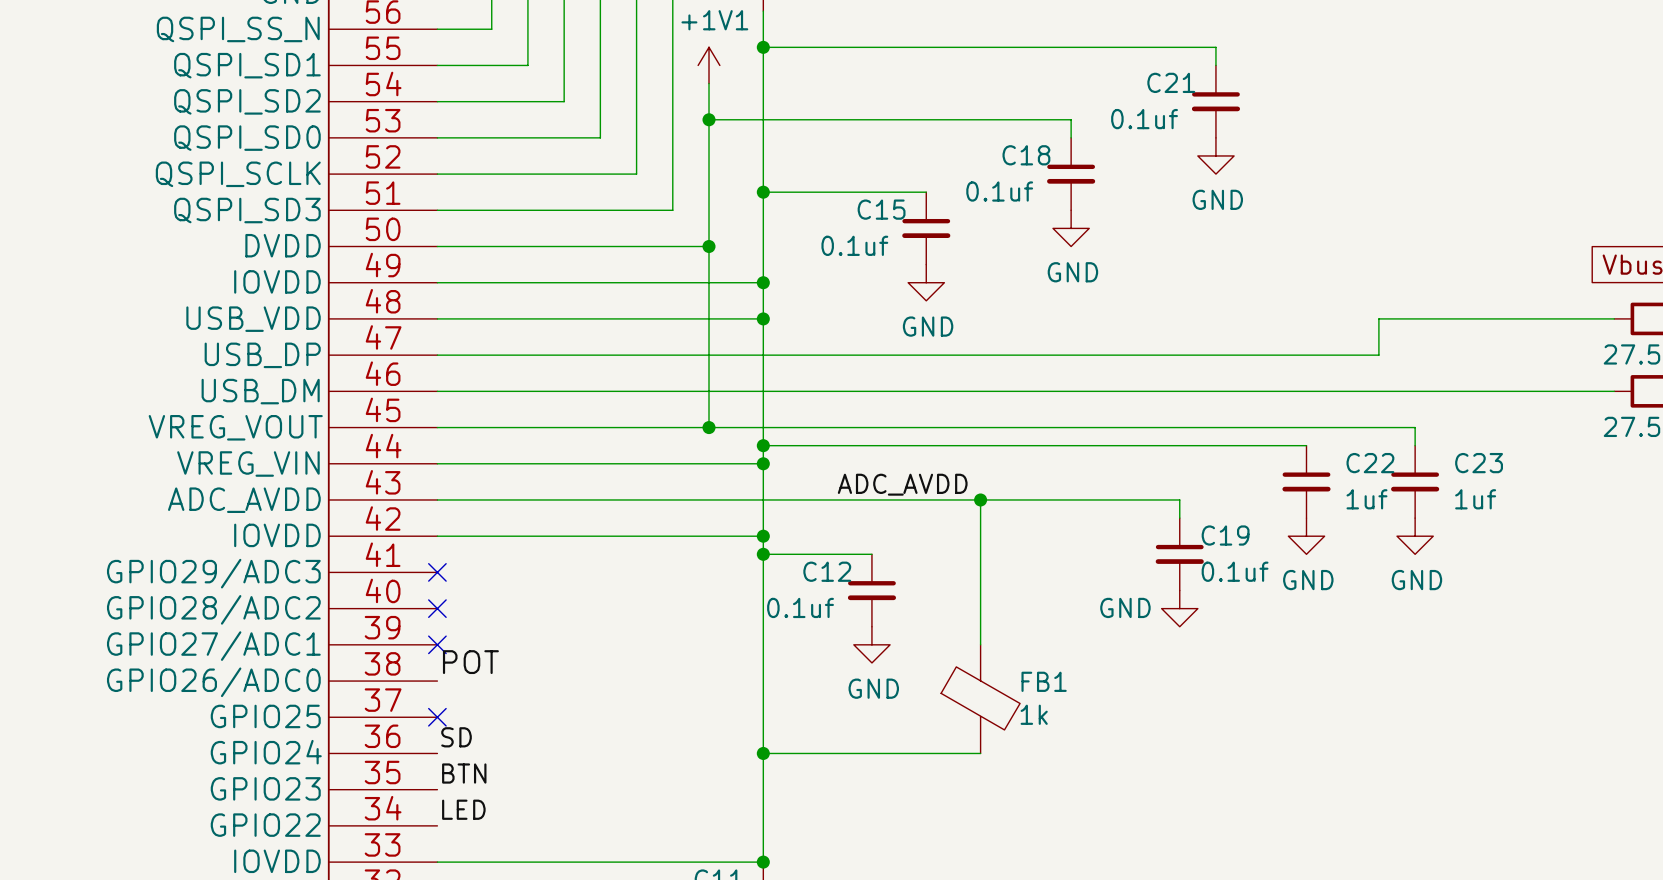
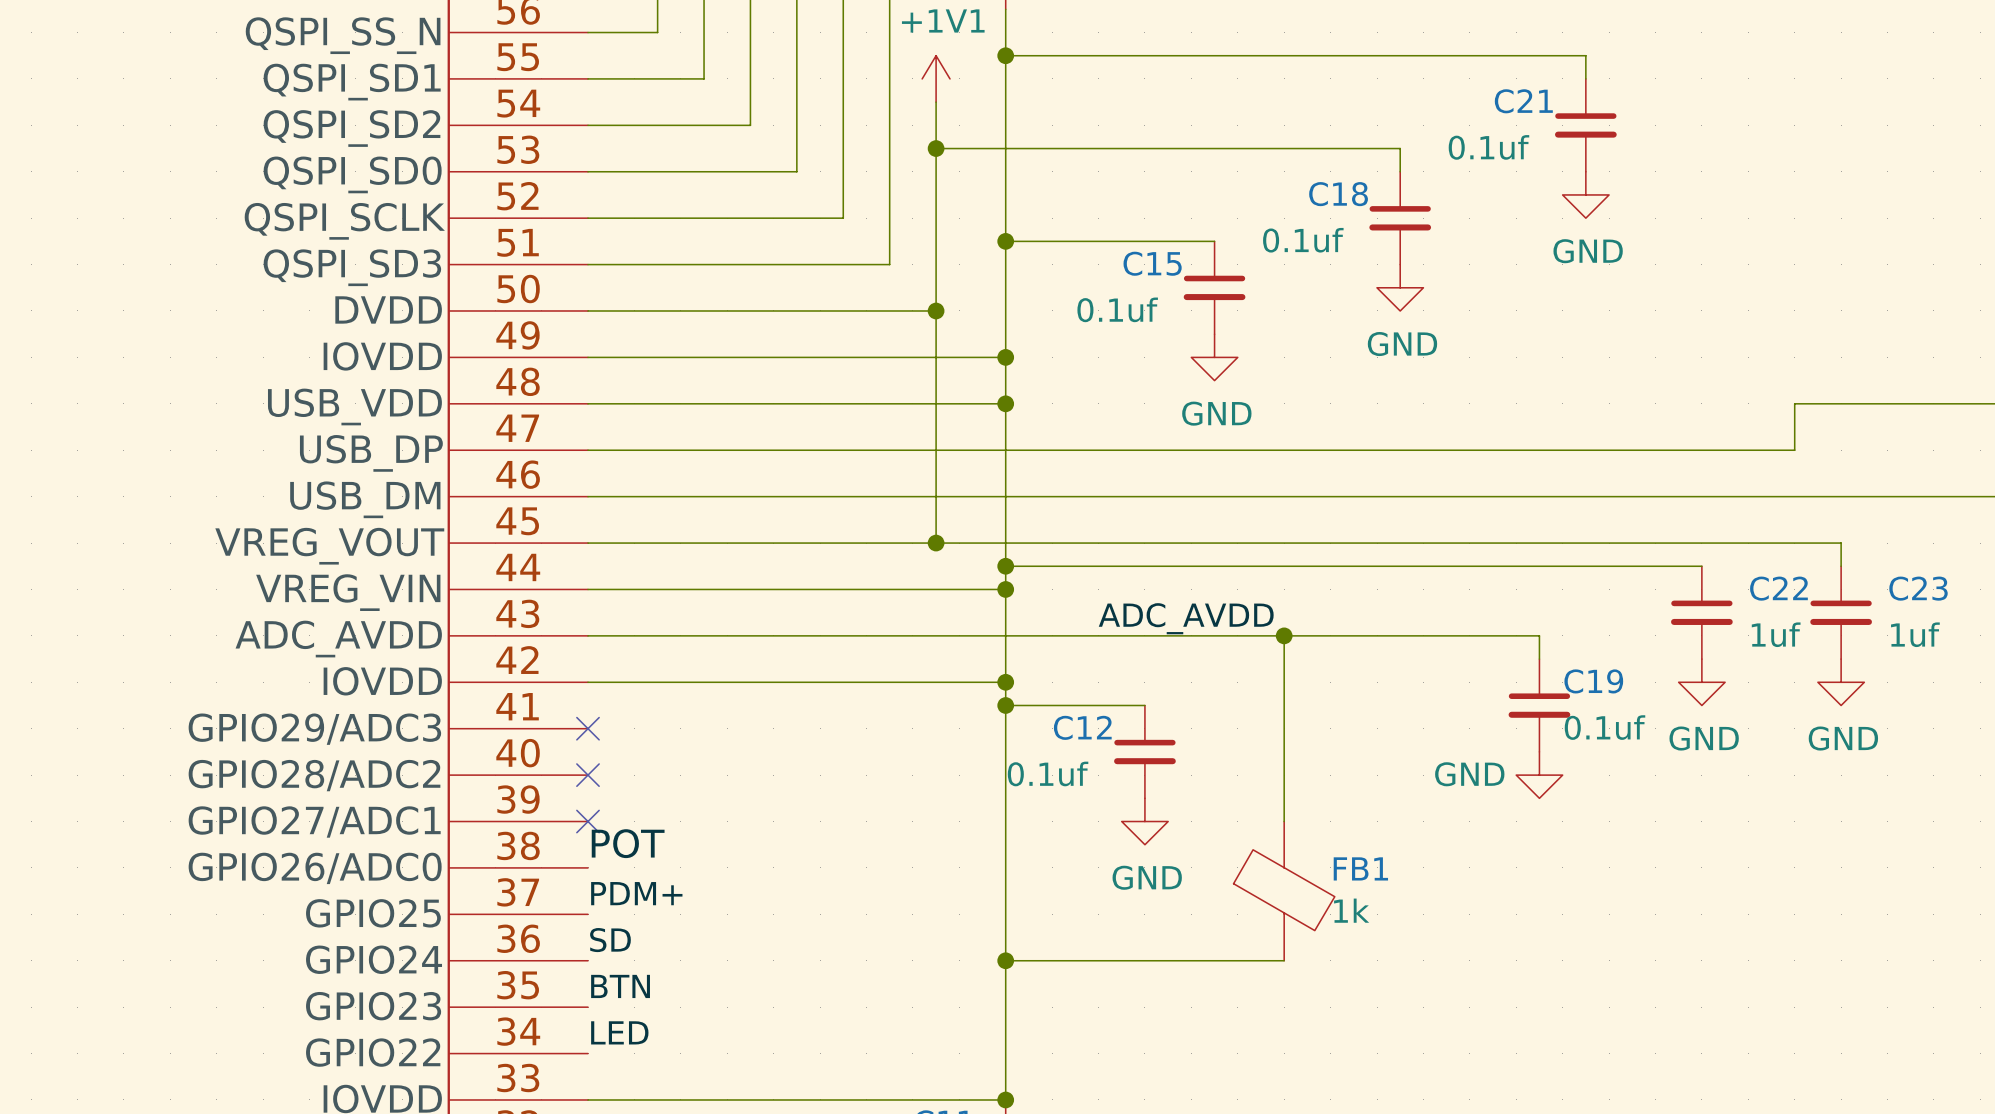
label: none -> PDM+ (636, 893)
no-connect mark: (437, 717) -> none

